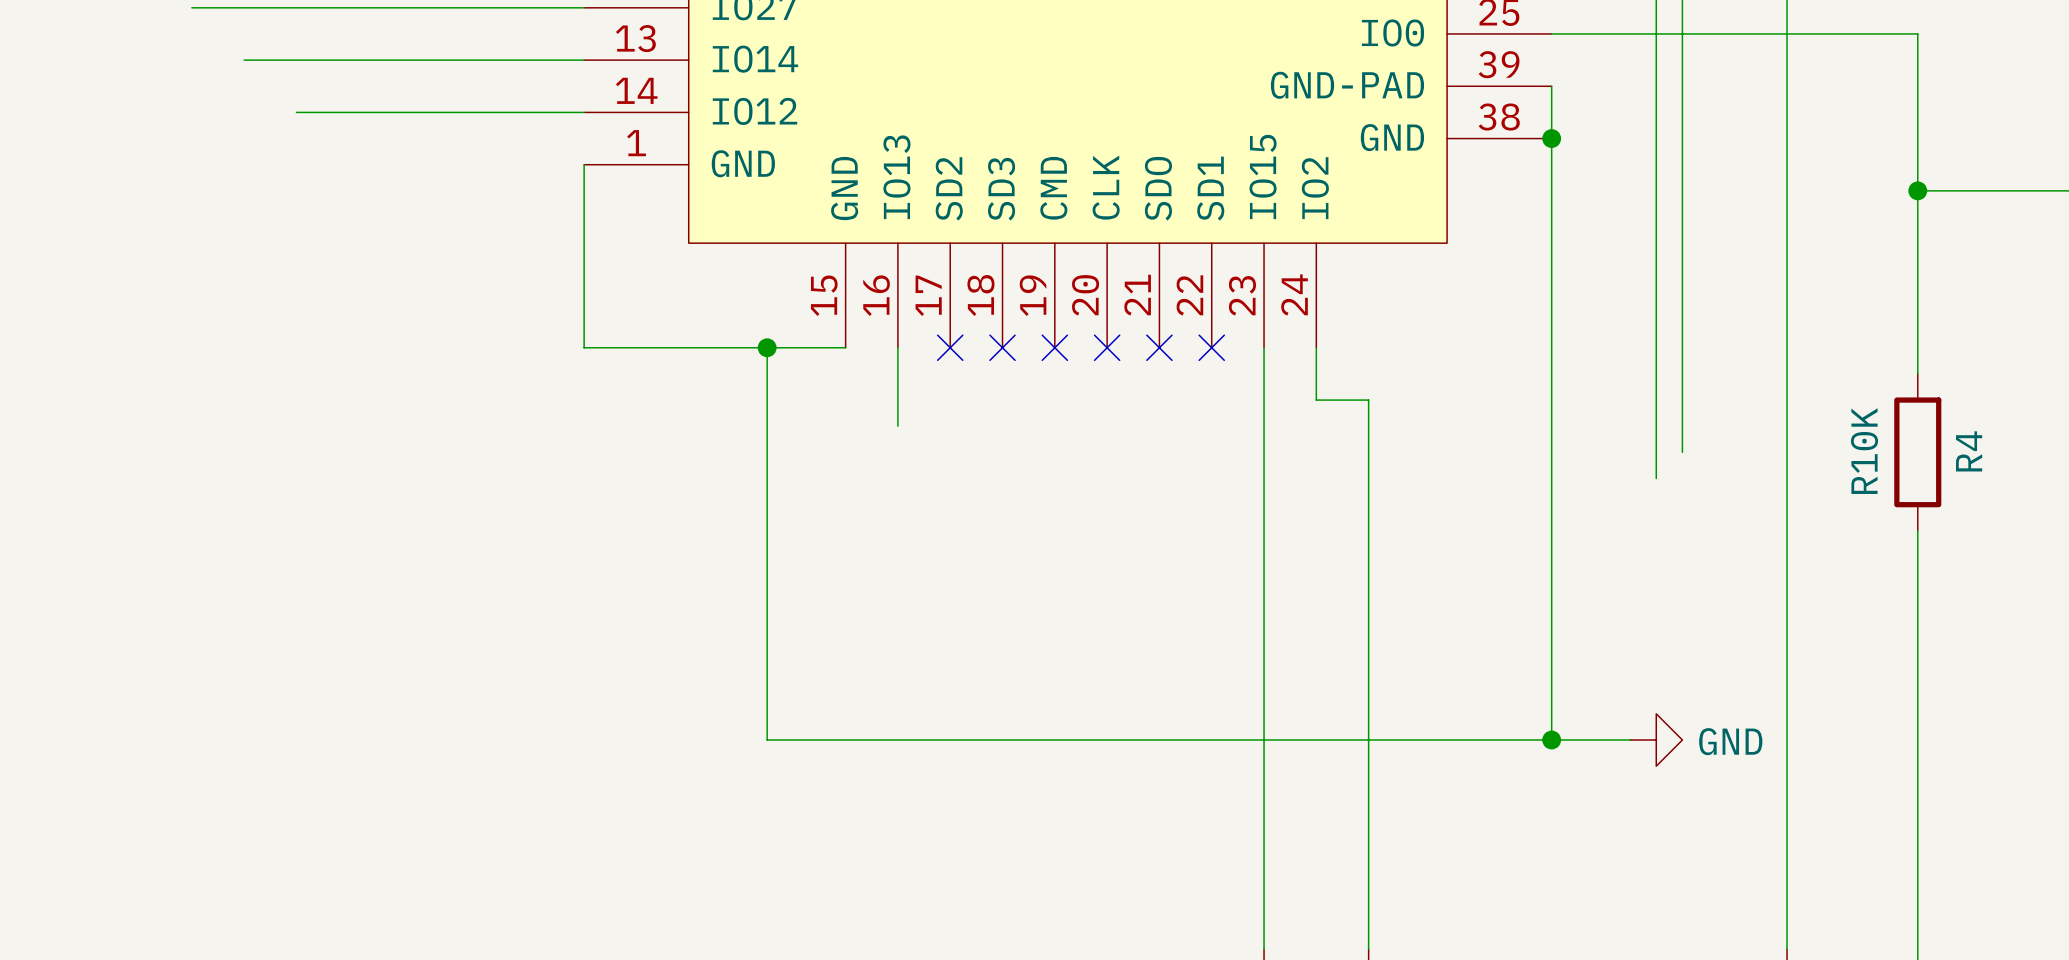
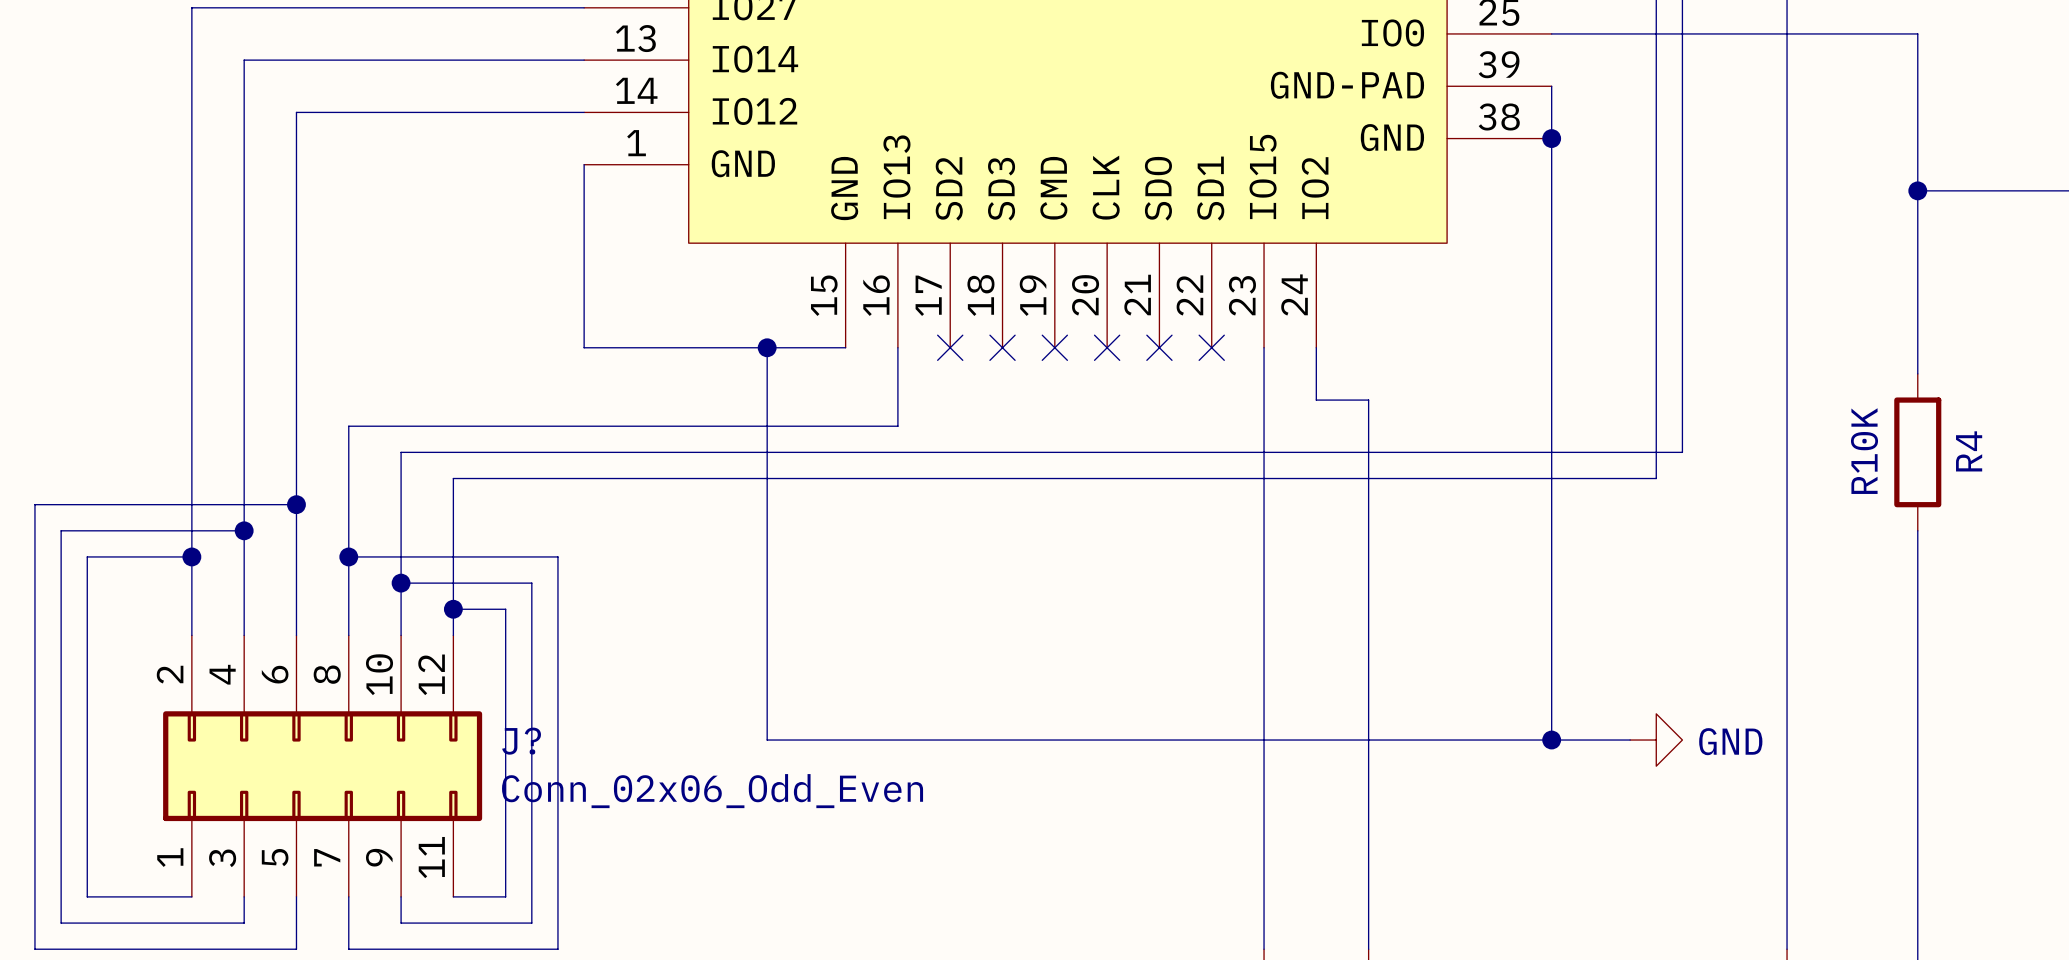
wire: none -> (191, 7) (191, 635)
wire: none -> (244, 60) (244, 635)
wire: none -> (296, 112) (296, 635)
wire: none -> (897, 426) (348, 426) (348, 635)
wire: none -> (1682, 452) (401, 452) (401, 635)
wire: none -> (1656, 478) (453, 478) (453, 635)
wire: none -> (296, 504) (34, 504) (34, 949) (296, 949) (296, 896)
junction: none -> (296, 504)
wire: none -> (244, 530) (61, 530) (61, 923) (244, 923) (244, 896)
junction: none -> (244, 530)
wire: none -> (191, 556) (87, 556) (87, 896) (191, 896)
junction: none -> (191, 556)
wire: none -> (348, 556) (557, 556) (557, 949) (348, 949) (348, 896)
junction: none -> (348, 556)
wire: none -> (401, 583) (531, 583) (531, 923) (401, 923) (401, 896)
junction: none -> (401, 583)
wire: none -> (453, 609) (505, 609) (505, 896) (453, 896)
junction: none -> (453, 609)
J?: none -> Conn_02x06_Odd_Even (322, 766)

